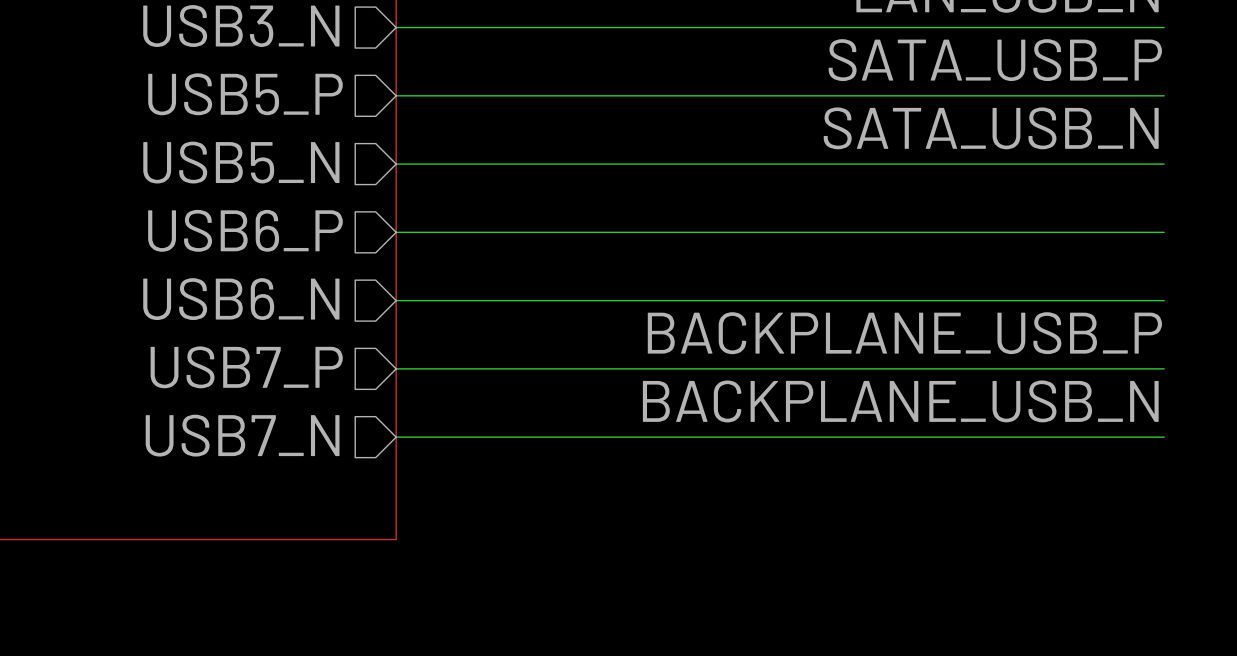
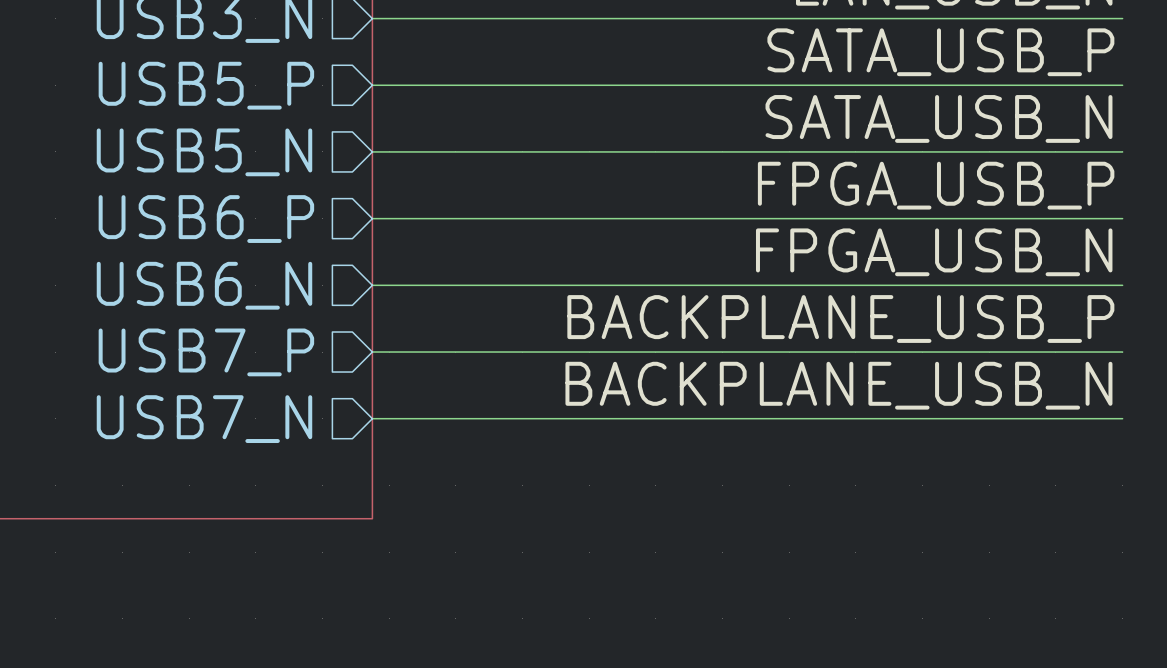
label: none -> FPGA_USB_P (936, 185)
label: none -> FPGA_USB_N (934, 252)

